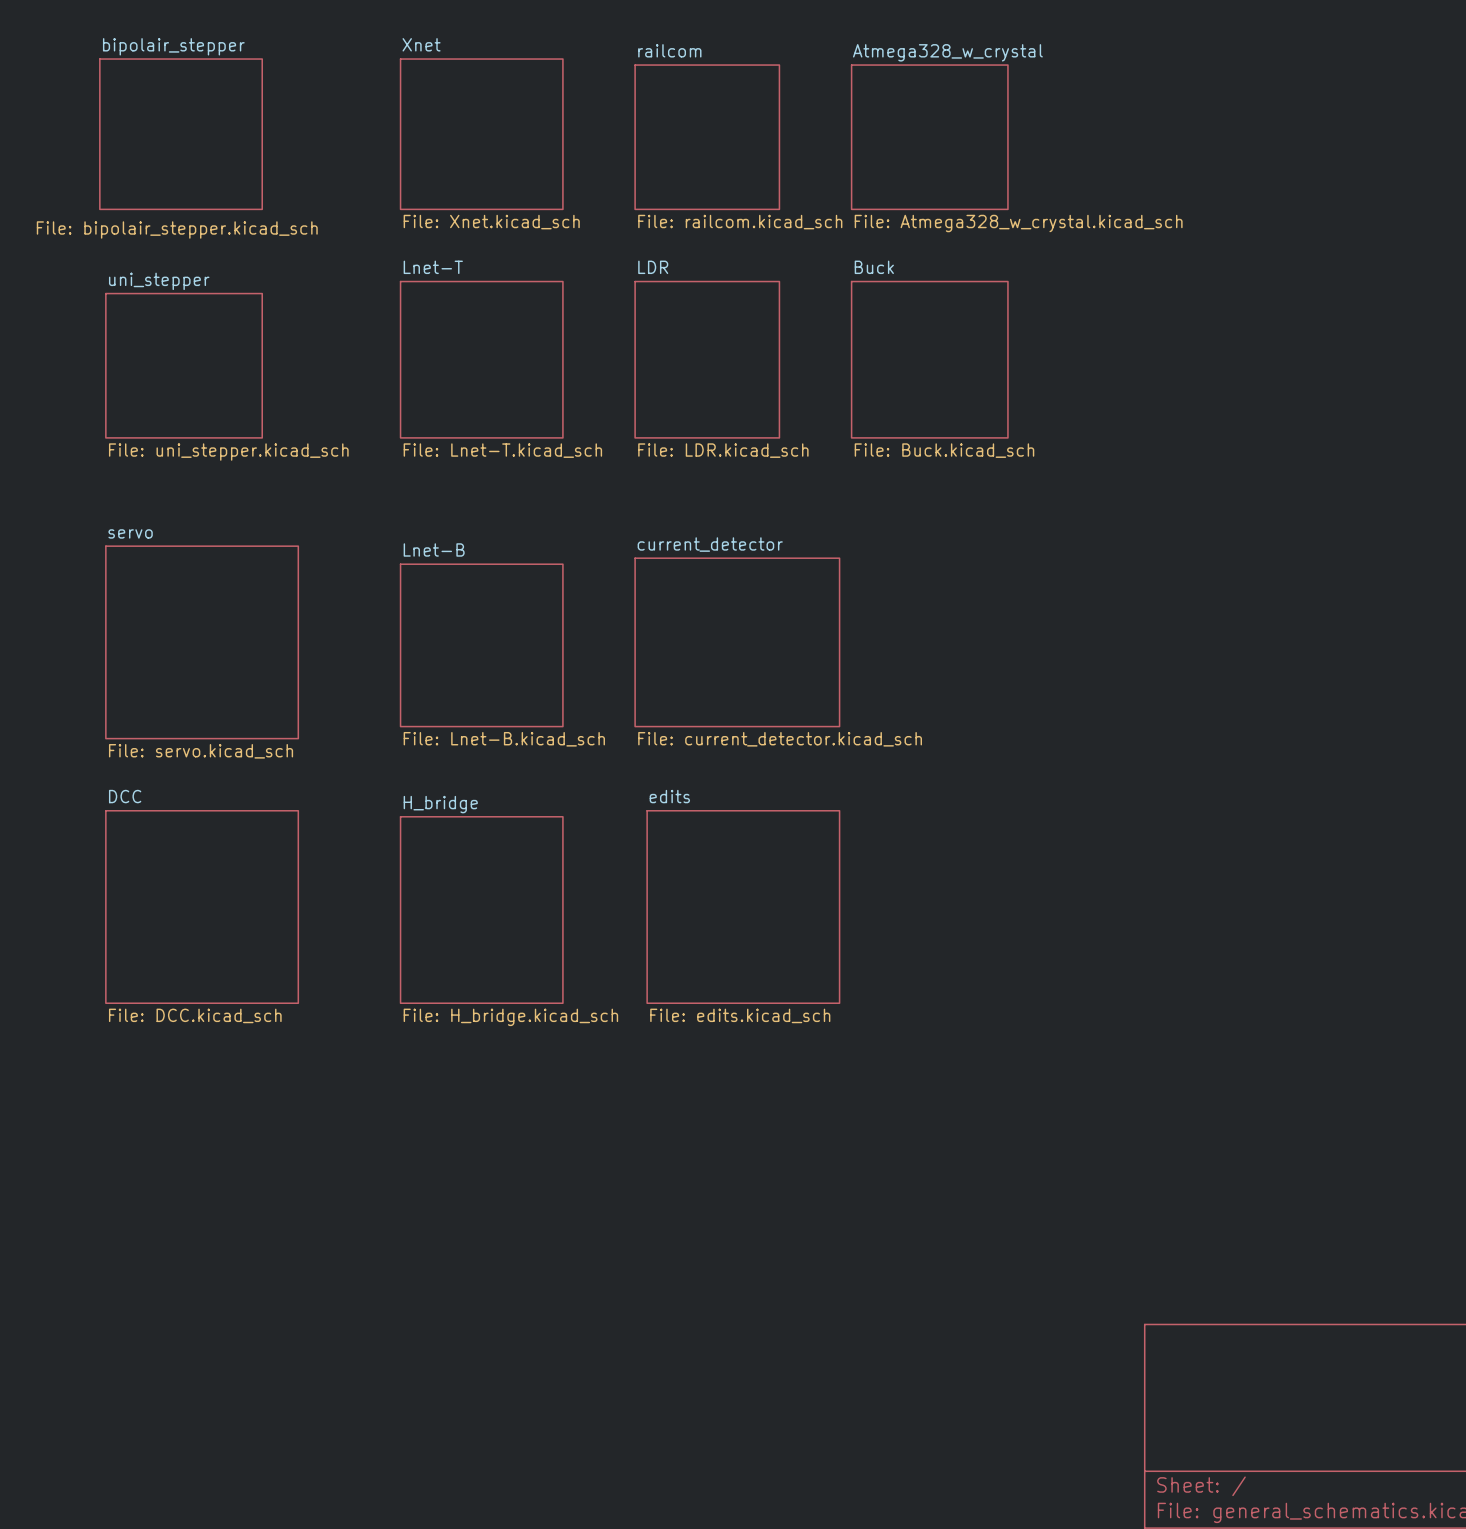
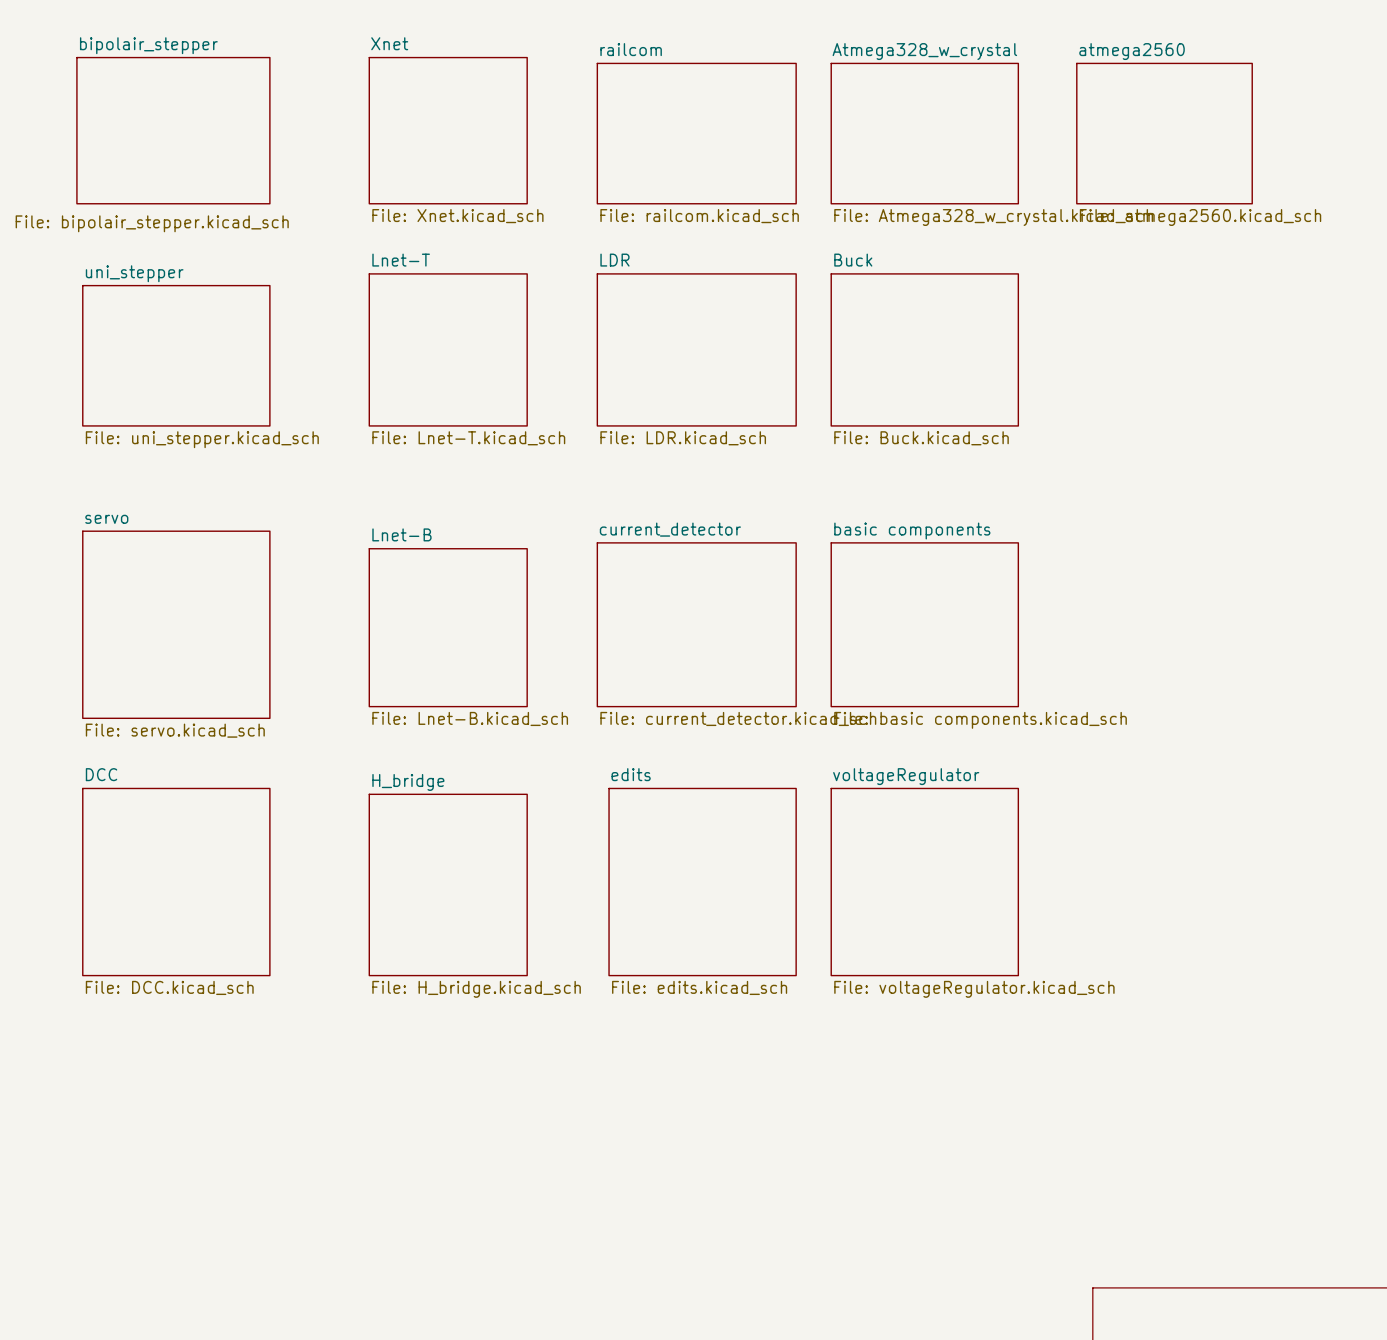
sheet Atmega328_w_crystal shape: [850, 64, 1009, 211] -> [830, 62, 1020, 205]
sheet bipolair_stepper: File: bipolair_stepper.kicad_sch (181, 134) -> none
sheet bipolair_stepper: none -> File: bipolair_stepper.kicad_sch (173, 130)
sheet railcom: File: railcom.kicad_sch (707, 137) -> none
sheet railcom: none -> File: railcom.kicad_sch (696, 133)
sheet atmega2560: none -> File: atmega2560.kicad_sch (1164, 133)
sheet LDR: File: LDR.kicad_sch (707, 359) -> none
sheet LDR: none -> File: LDR.kicad_sch (696, 349)
sheet Buck: File: Buck.kicad_sch (929, 359) -> none
sheet Buck: none -> File: Buck.kicad_sch (924, 349)
sheet uni_stepper: File: uni_stepper.kicad_sch (184, 365) -> none
sheet uni_stepper: none -> File: uni_stepper.kicad_sch (176, 355)
sheet basic components: none -> File: basic components.kicad_sch (924, 624)
sheet voltageRegulator: none -> File: voltageRegulator.kicad_sch (924, 882)

